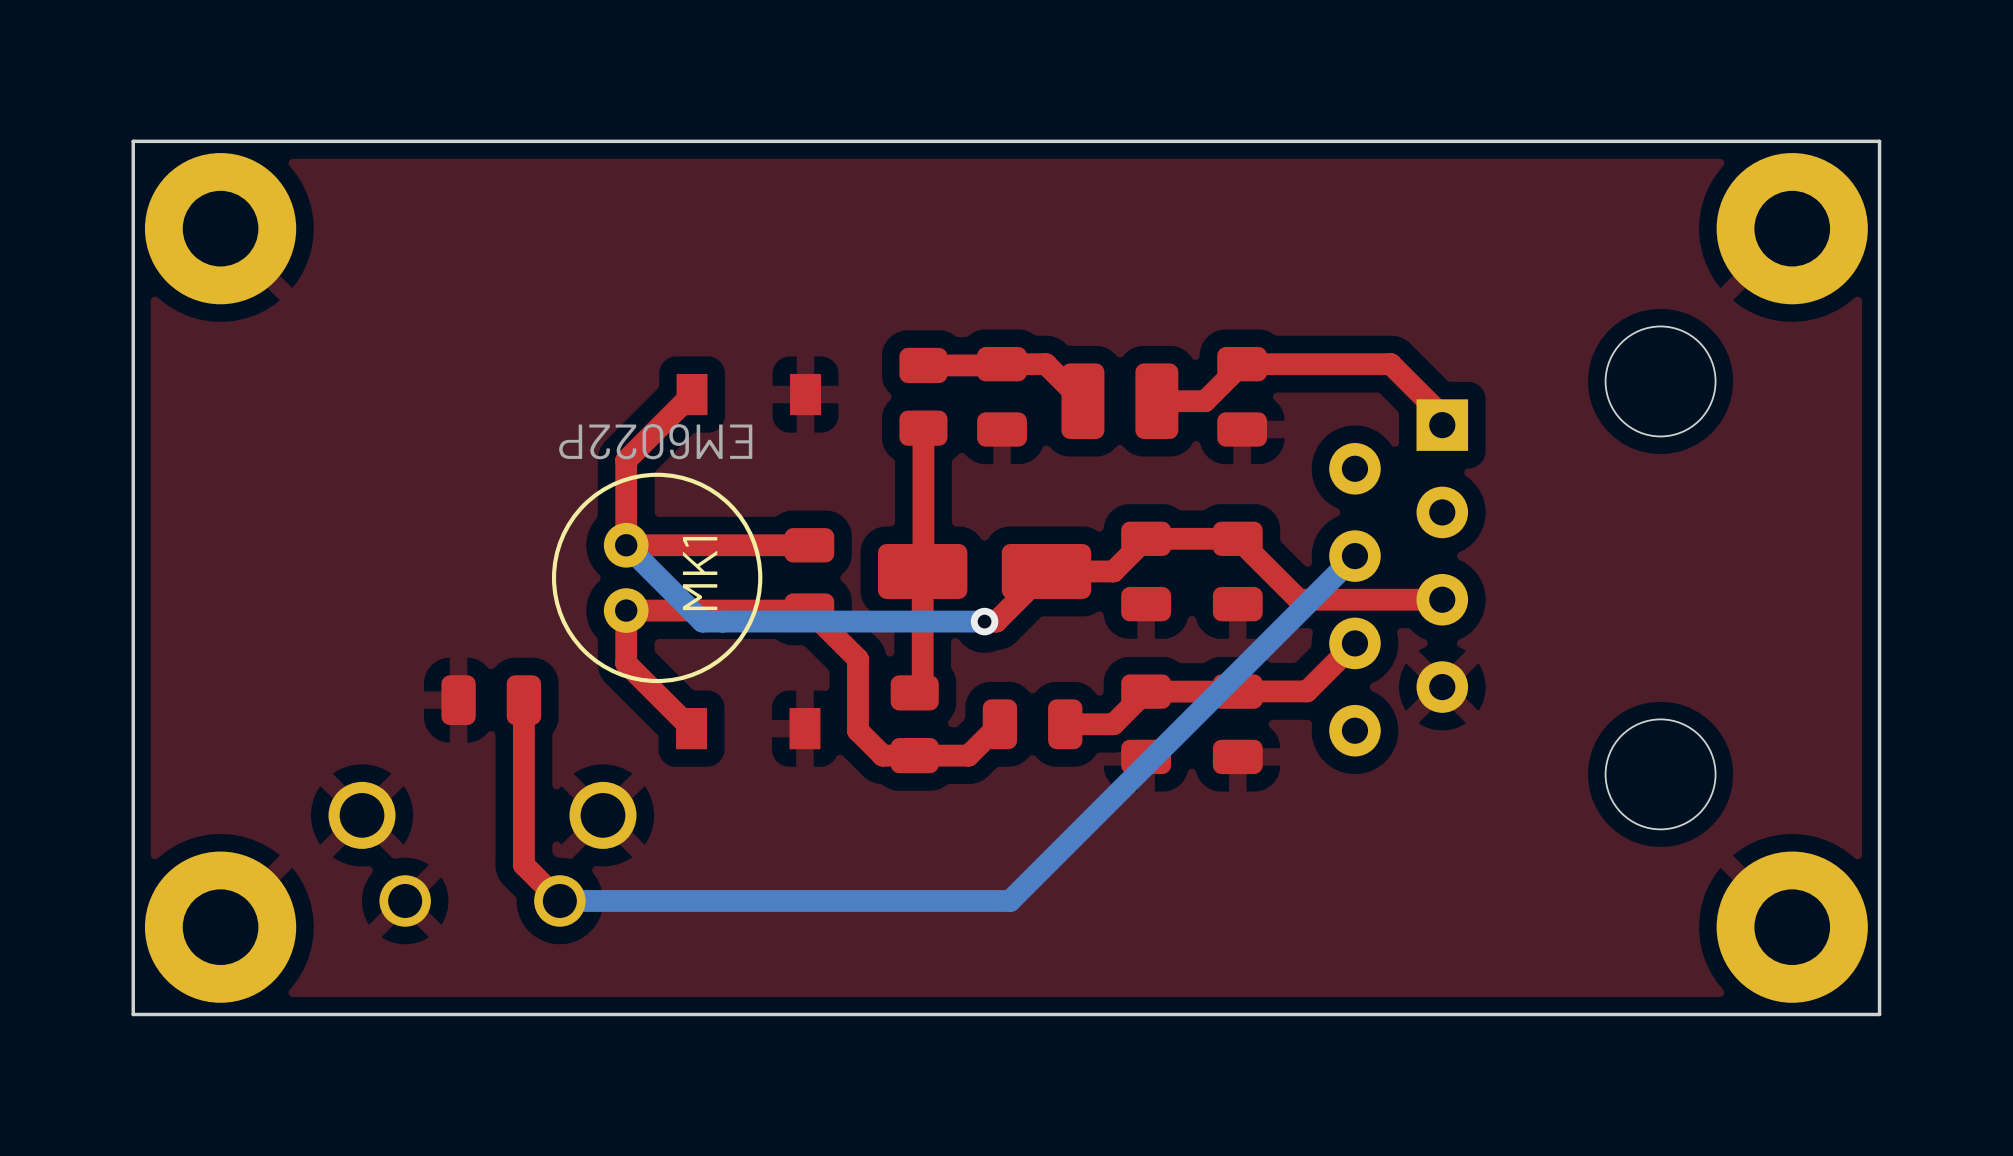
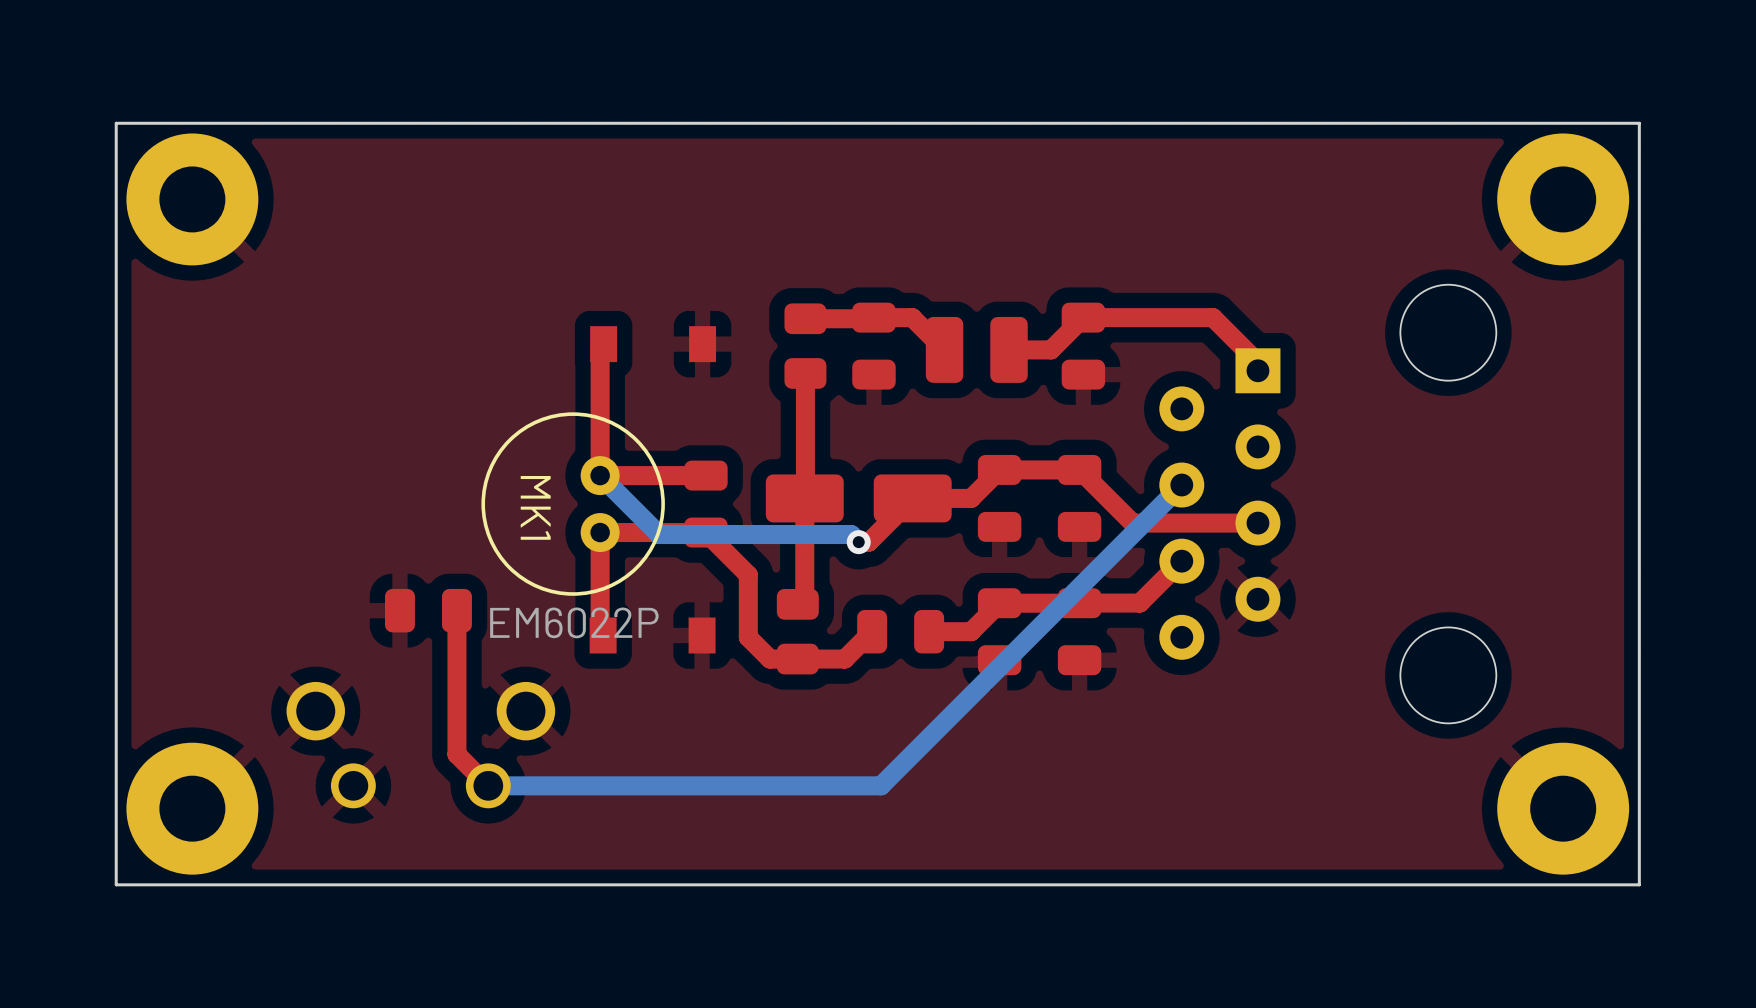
top track: (688, 398) (626, 460) (626, 545) (688, 545) -> (600, 347) (600, 475)
bottom track: (626, 545) (702, 621) (984, 621) -> (600, 475) (659, 534) (851, 534) (858, 542)
MK1 rotation: 0° (657, 577) -> 180° (573, 504)
top track: (688, 610) (626, 610) (626, 663) (688, 725) -> (600, 532) (600, 632)

